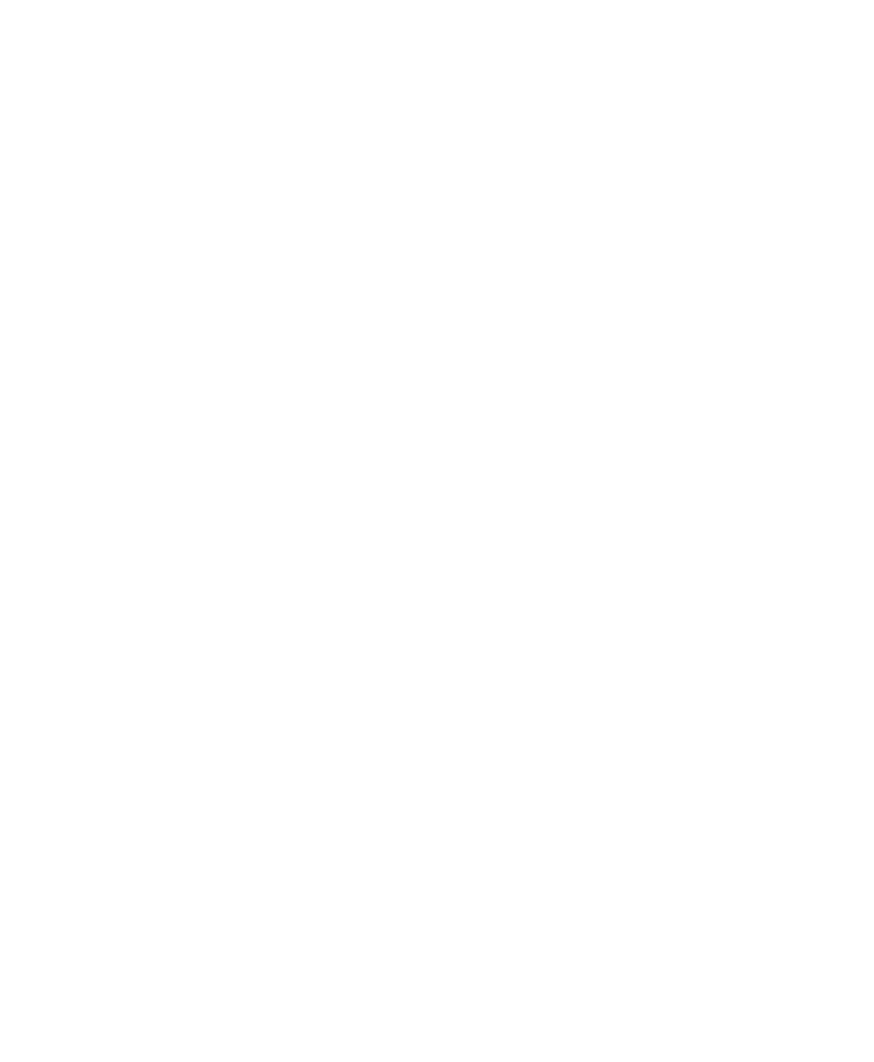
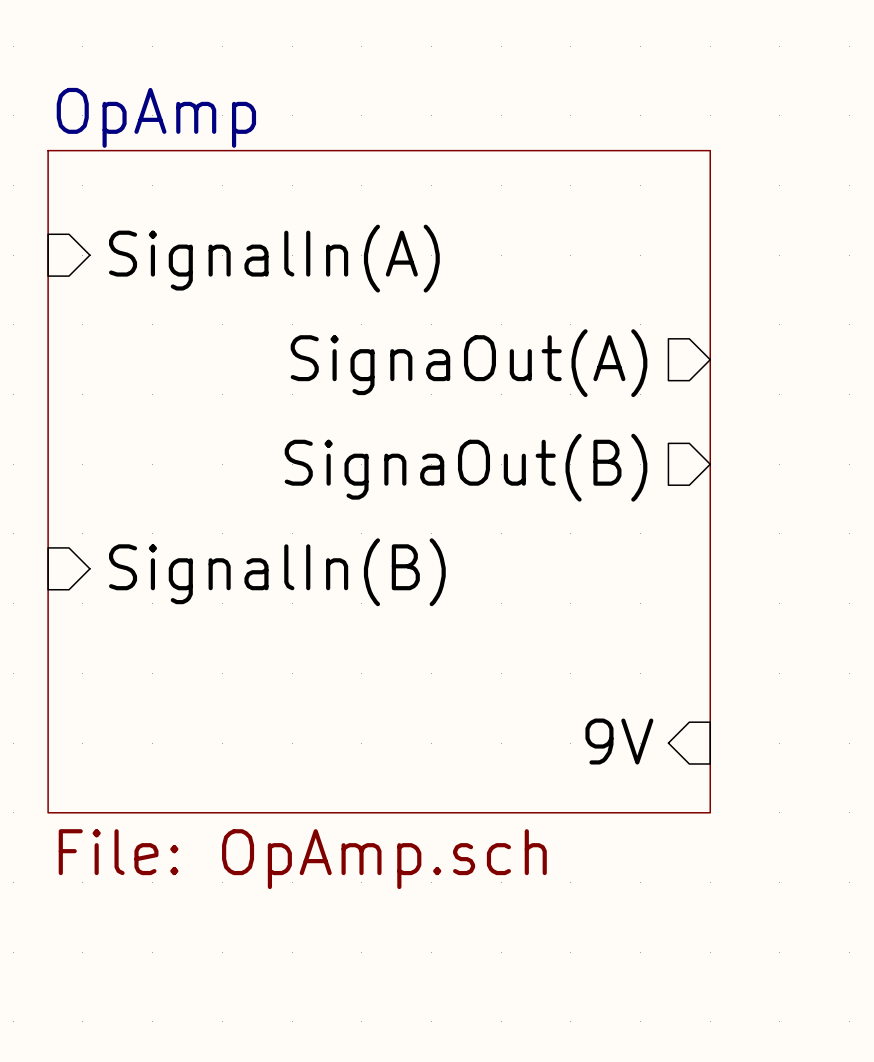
sheet pin: none -> SignalIn(A) (274, 258)
sheet pin: none -> SignaOut(A) (469, 363)
sheet pin: none -> SignaOut(B) (466, 467)
sheet OpAmp: none -> File: OpAmp.sch (379, 481)
sheet pin: none -> SignalIn(B) (277, 572)
sheet pin: none -> 9V (619, 741)

